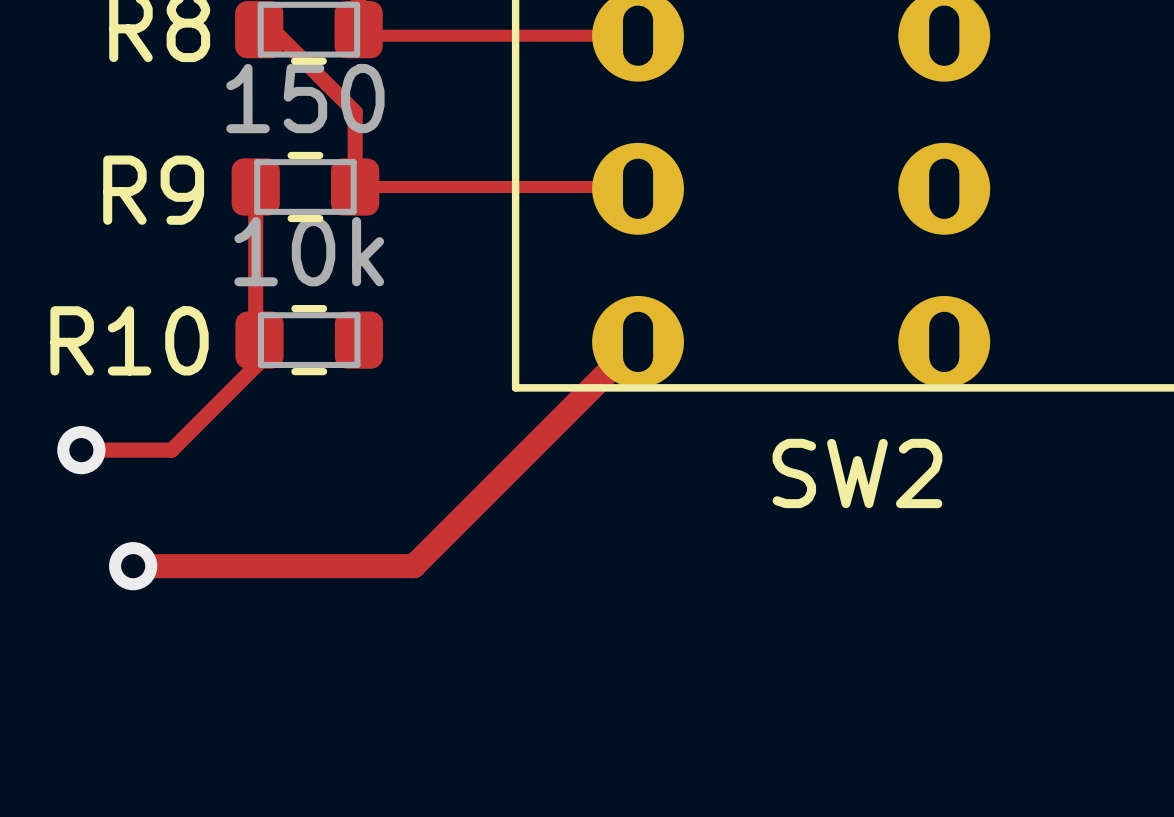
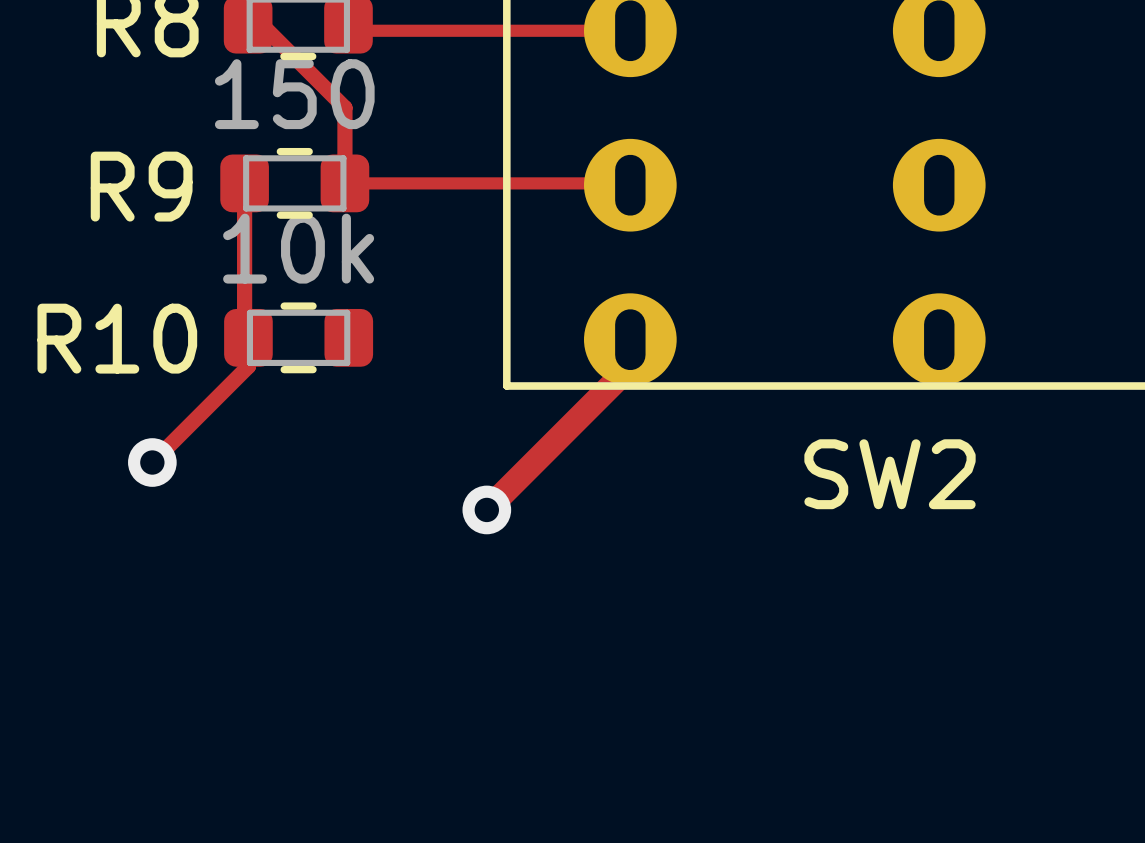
track: (638, 341) (413, 566) (133, 566) -> none
track: none -> (640, 343) (634, 337) (634, 362) (486, 509)
track: (259, 362) (171, 450) (81, 450) -> (248, 360) (248, 366) (152, 462)
via: (81, 450) -> none
via: none -> (152, 462)
SW2 name position: SW2 (857, 473) -> SW2 (890, 474)
via: none -> (486, 509)
via: (133, 566) -> none

